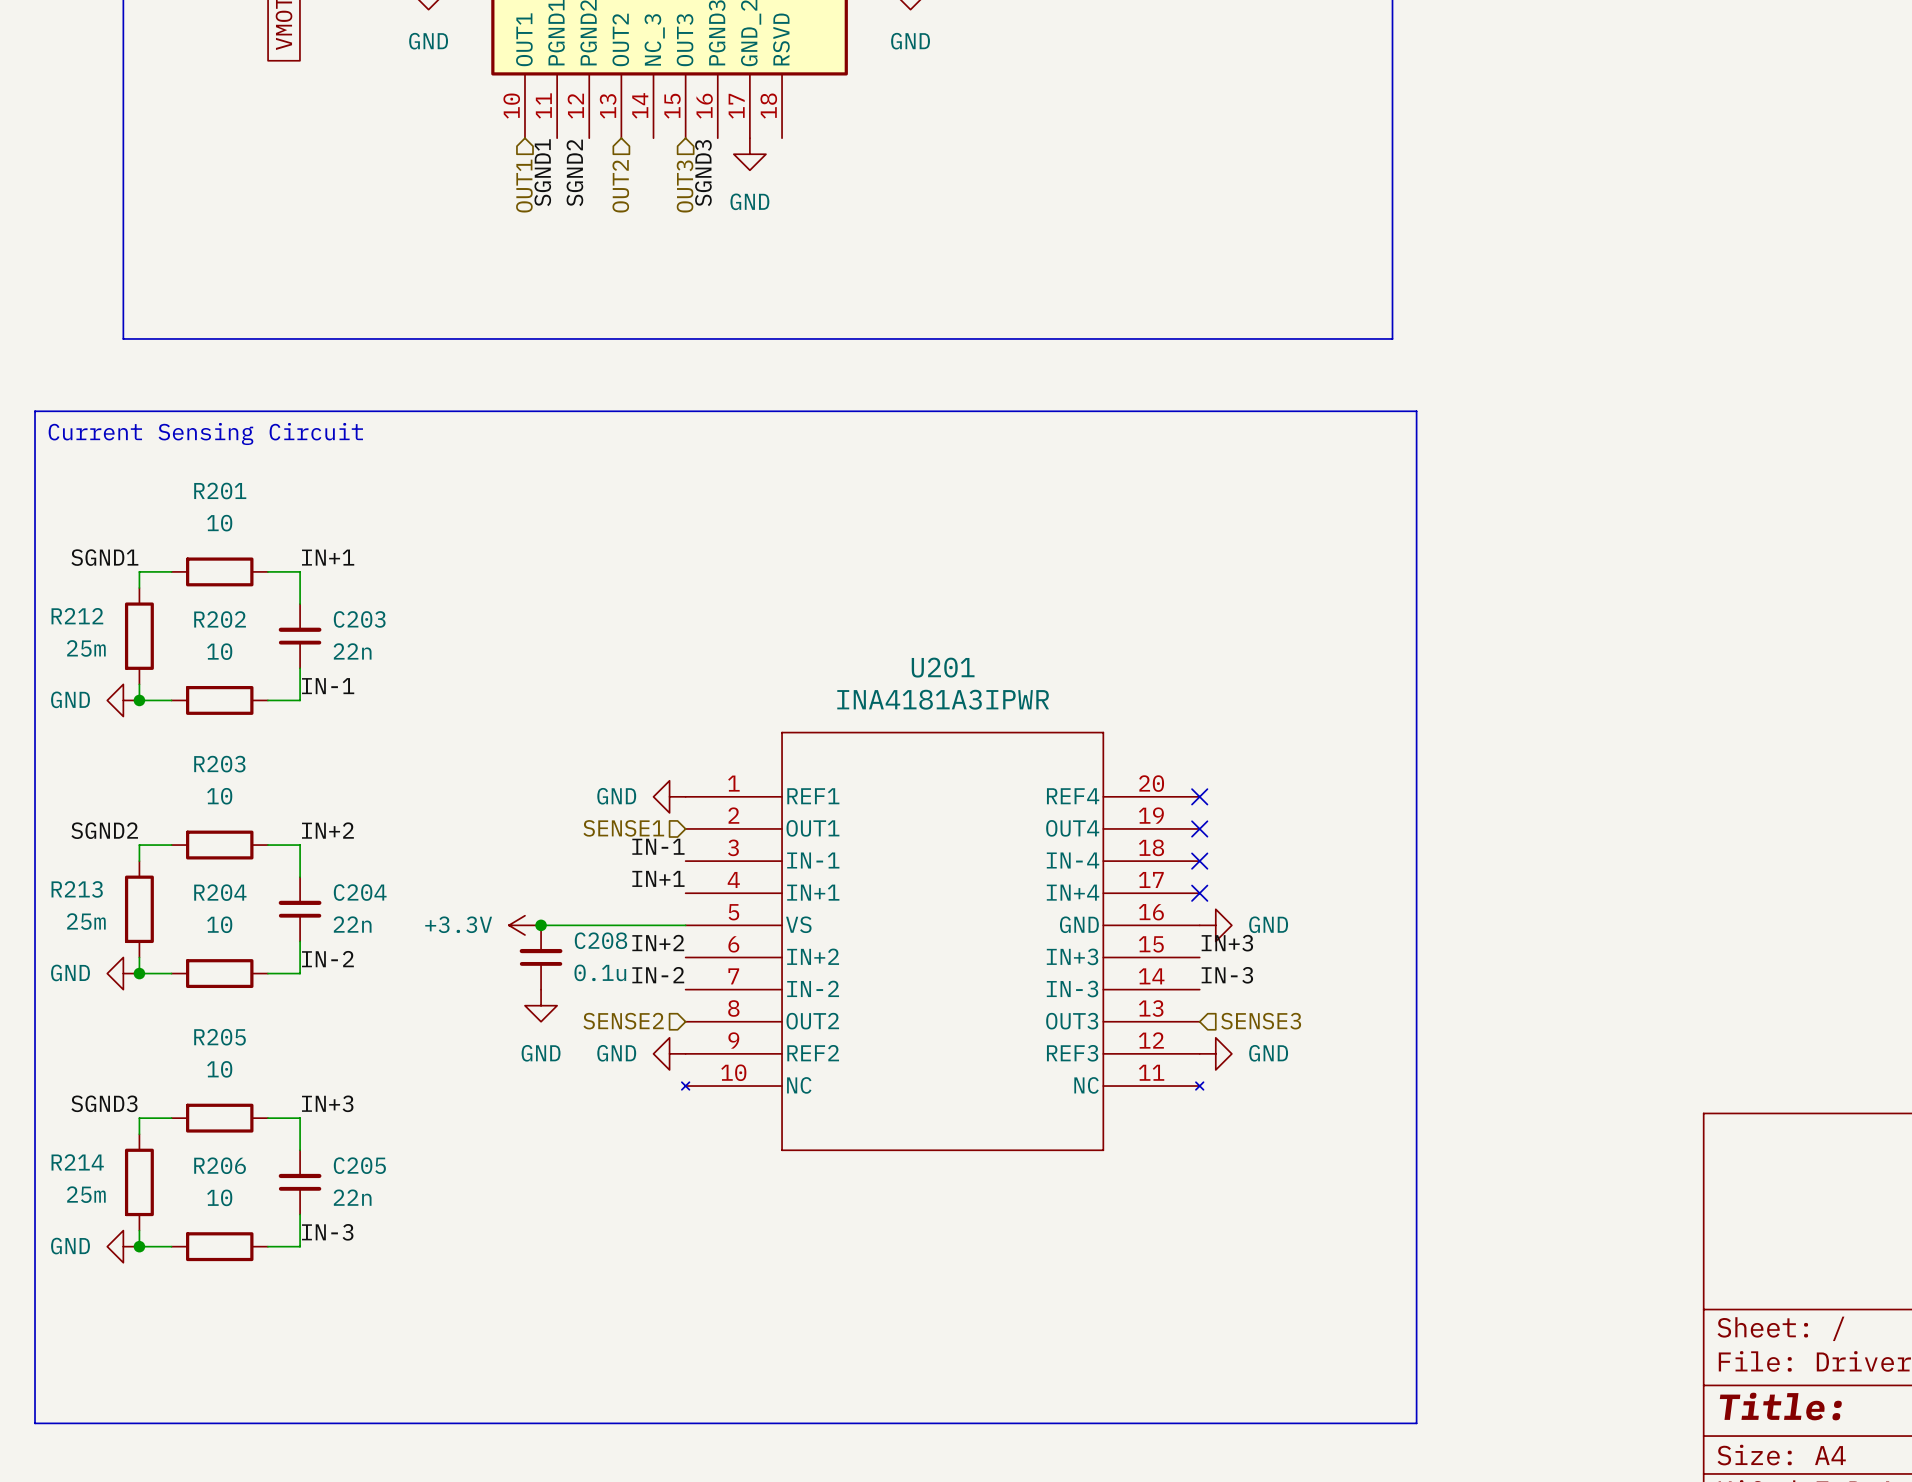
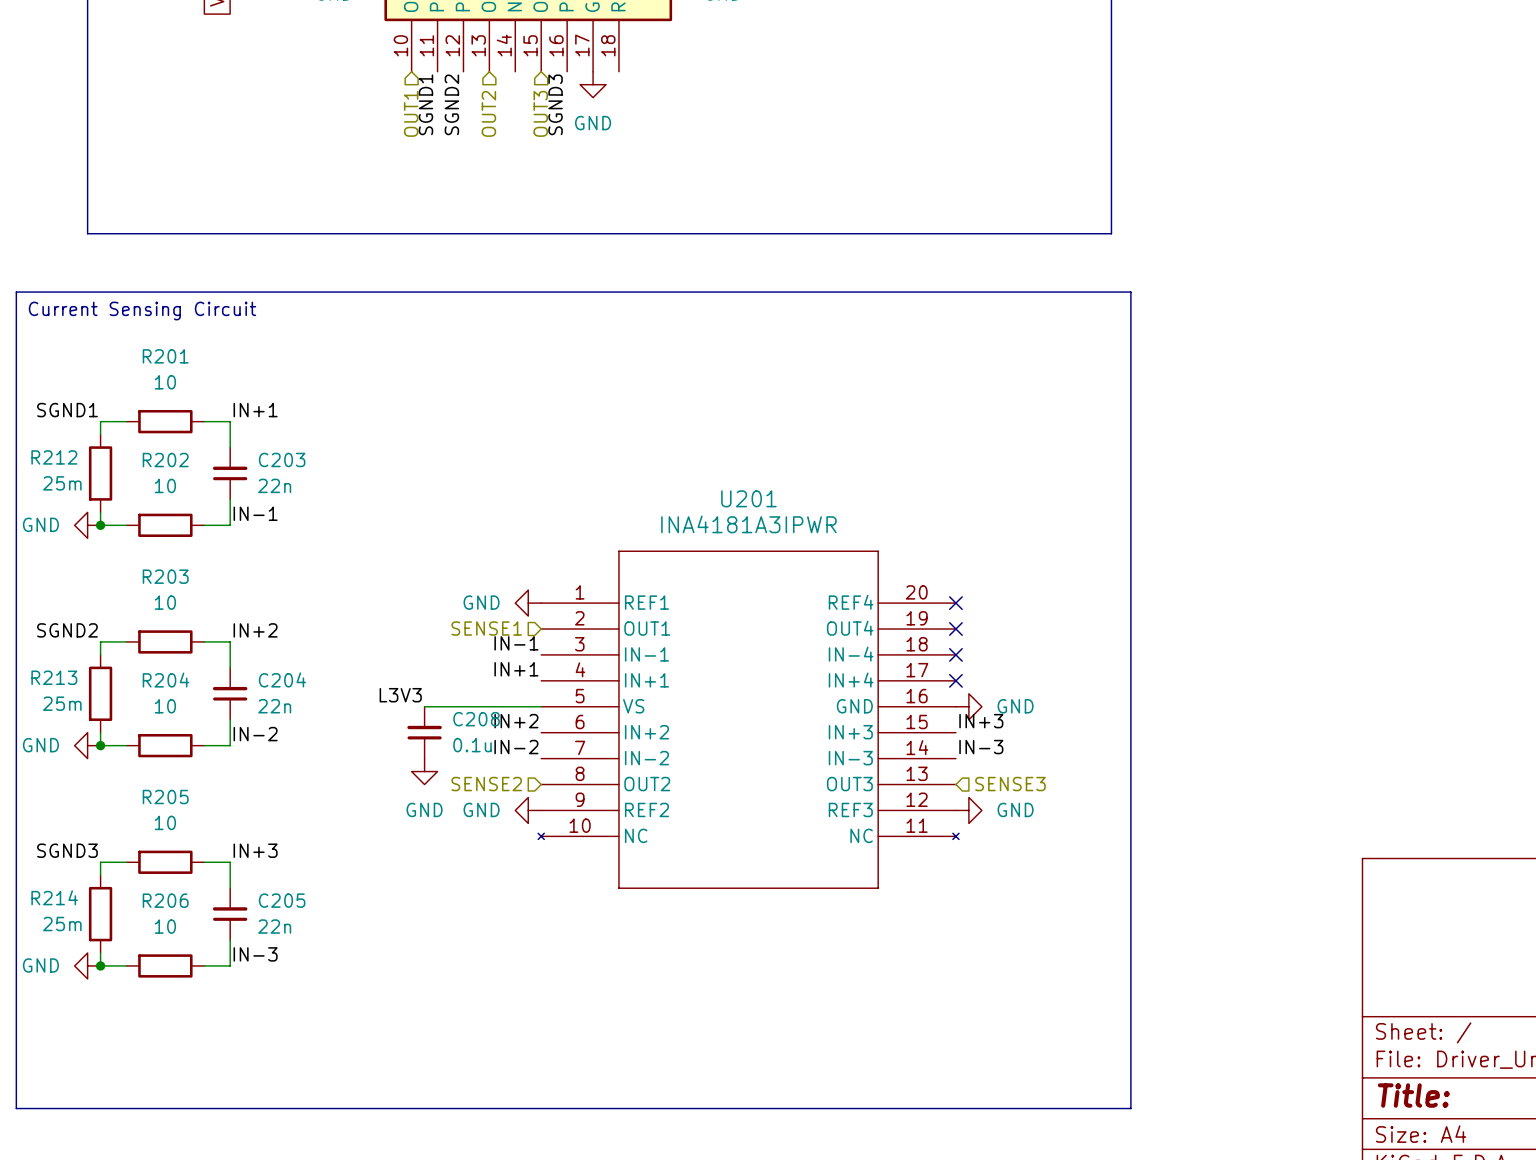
label: none -> L3V3 (400, 695)
power symbol: +3.3V (524, 925) -> none
junction: (541, 925) -> none

